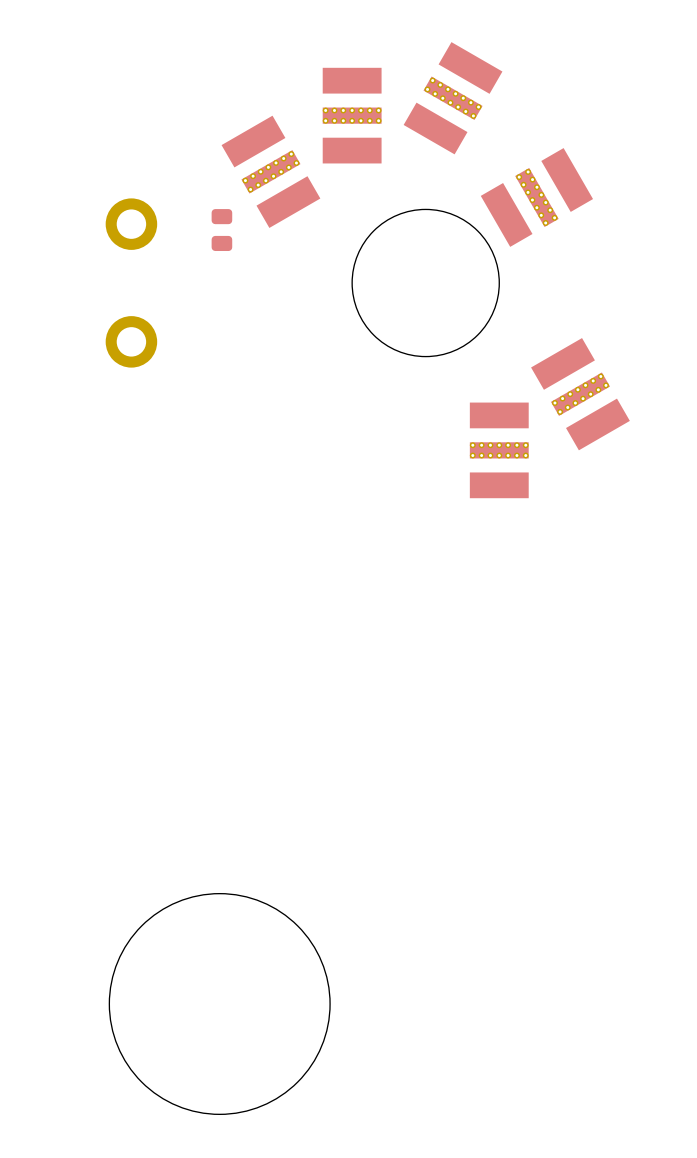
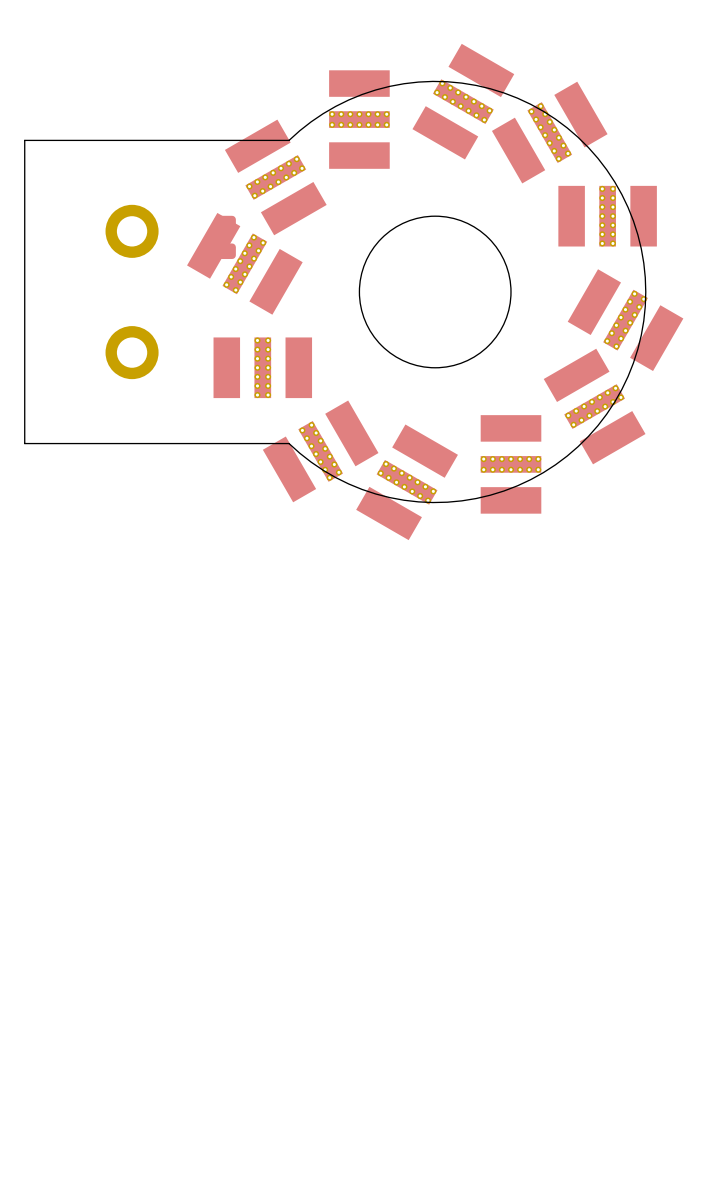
board edge: none -> (289, 140) (24, 140) (24, 443) (289, 443) (323, 470) (362, 489) (389, 497) (432, 502) (461, 500) (504, 490) (543, 472) (578, 446) (606, 414) (628, 376) (641, 335) (645, 291) (643, 263) (633, 221) (614, 181) (588, 147) (567, 127) (530, 104) (490, 88) (447, 81) (404, 83) (362, 94) (323, 113) (289, 140)
part position: (536, 197) -> (549, 132)
part: none -> (607, 216)
part: none -> (244, 263)
part: none -> (625, 320)
part: none -> (262, 367)
part: none -> (320, 451)
part: none -> (407, 482)
round board edge: [108, 893, 331, 1115] -> none

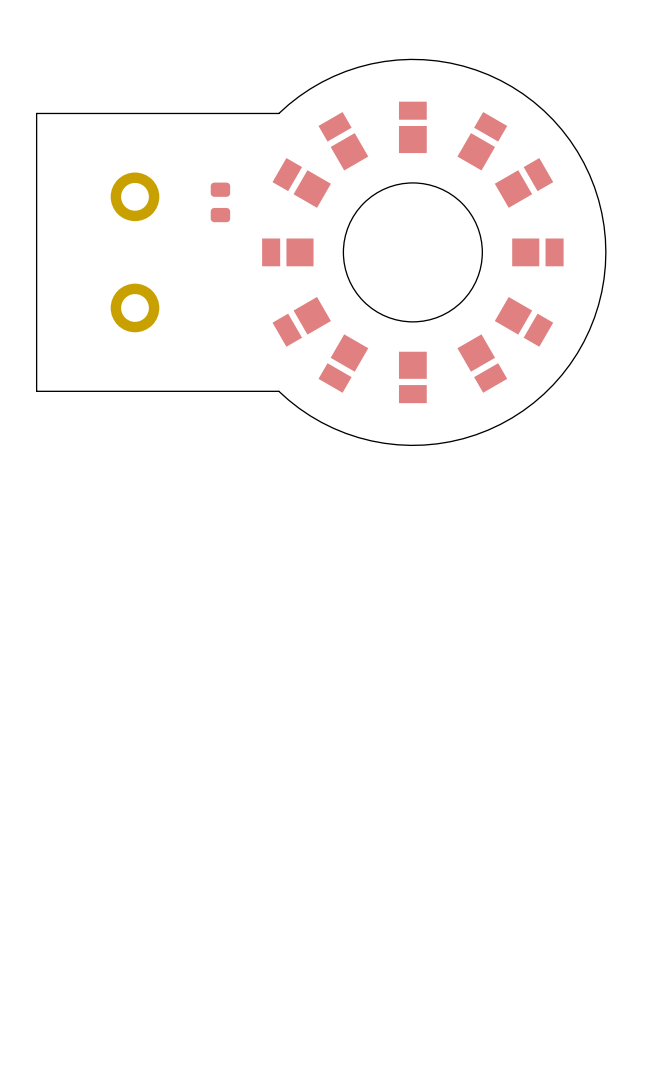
part: (463, 101) -> none
part: (359, 119) -> none
part: (549, 132) -> none
part: none -> (412, 127)
part: none -> (343, 141)
part: none -> (482, 141)
part: (275, 177) -> none
part: none -> (301, 182)
part: none -> (524, 182)
part: (607, 216) -> none
part: (244, 263) -> none
part: none -> (287, 252)
part: none -> (537, 252)
part: (625, 320) -> none
part: (262, 367) -> none
part: none -> (301, 321)
part: none -> (524, 321)
part: (594, 406) -> none
part: none -> (343, 363)
part: none -> (482, 363)
part: none -> (412, 377)
part: (320, 451) -> none
part: (510, 464) -> none
part: (407, 482) -> none

